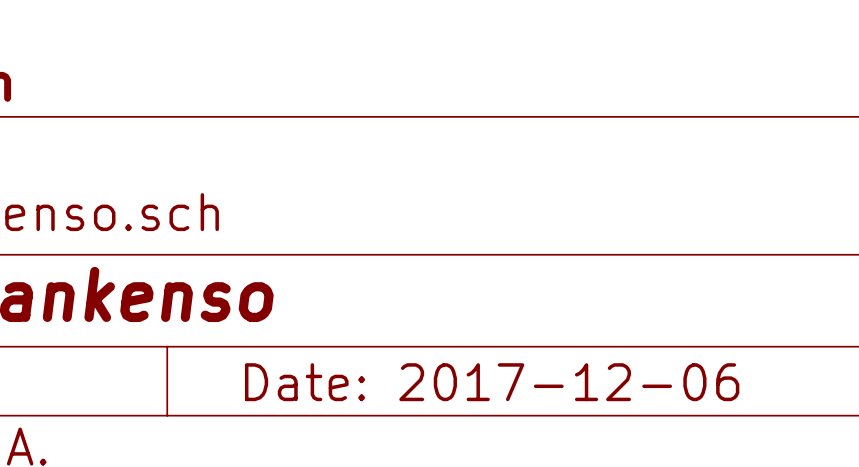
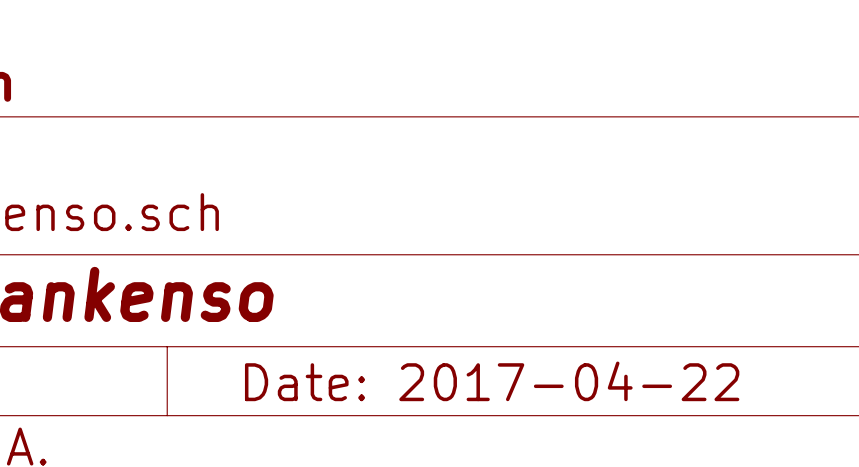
title block: Date: 2017-12-06 (492, 382) -> Date: 2017-04-22 (492, 381)

